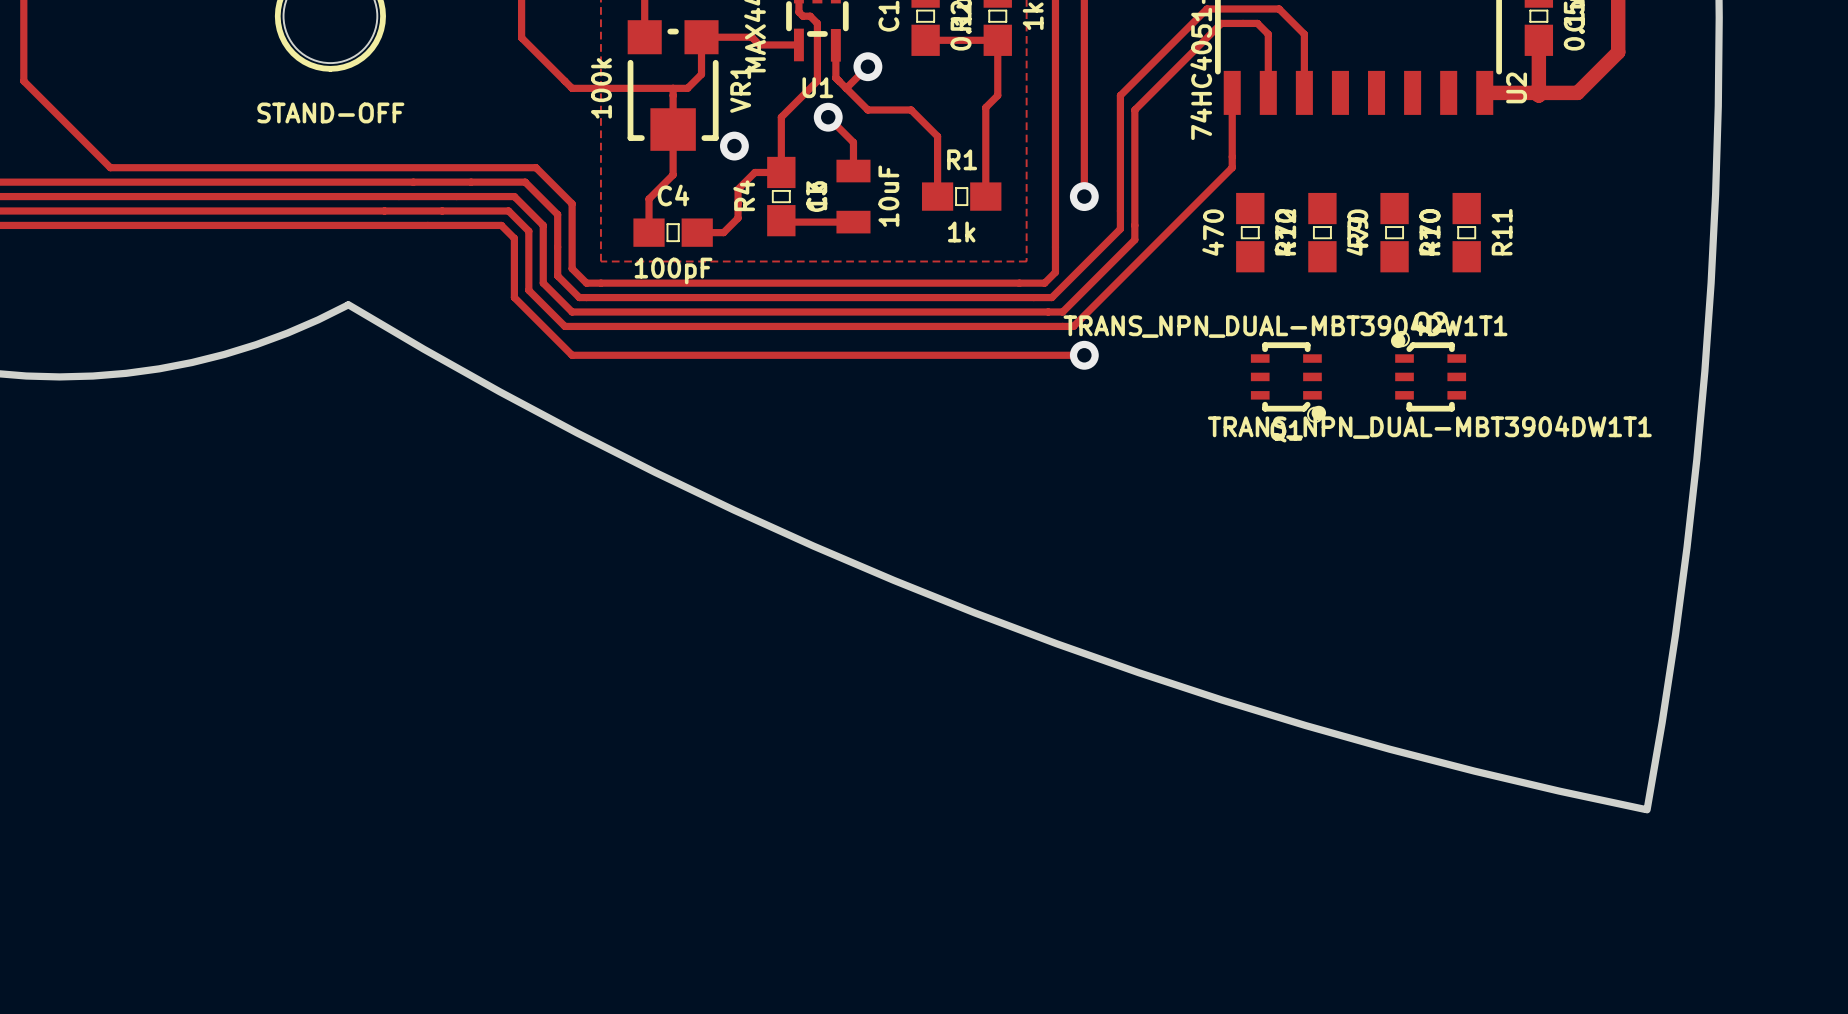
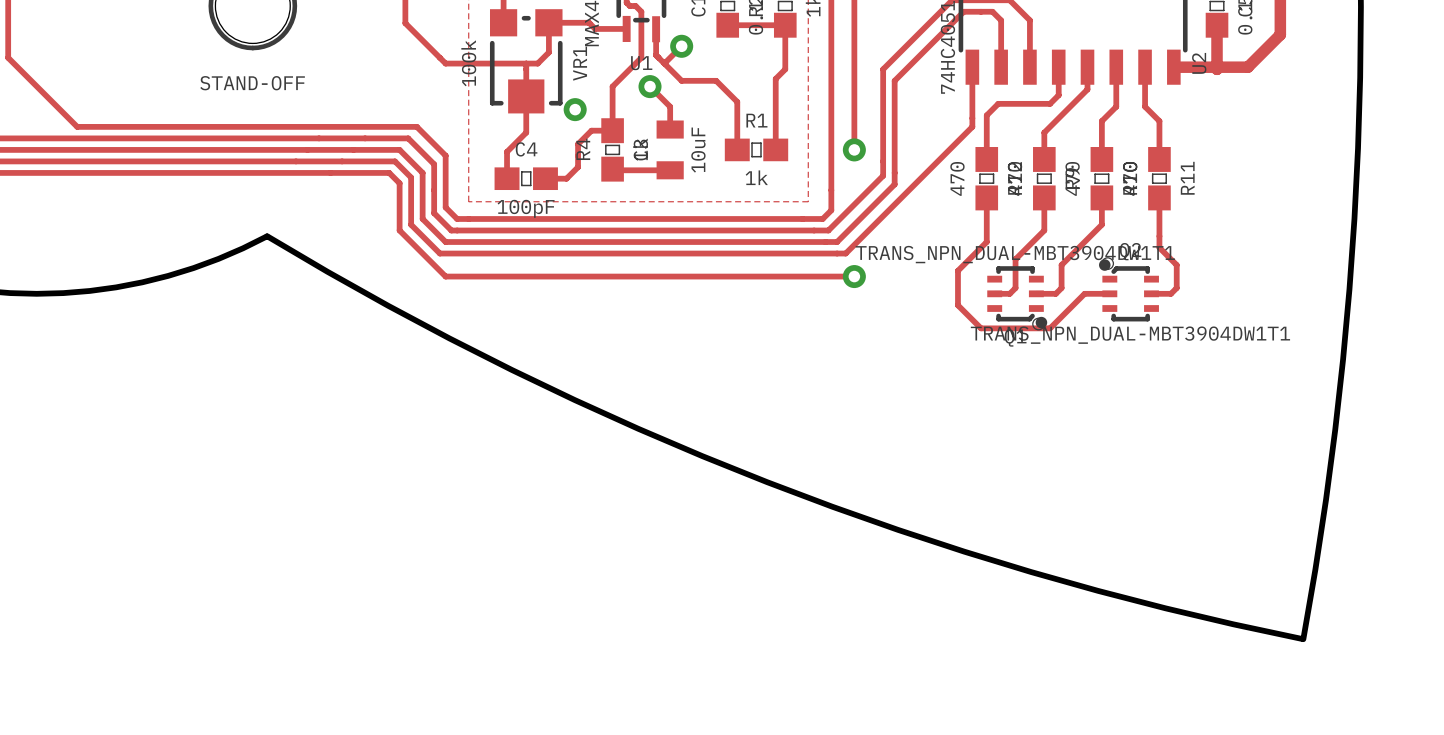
track: none -> (1058, 67) (1058, 95) (1050, 103) (998, 103) (986, 115) (986, 159)
track: none -> (1087, 67) (1087, 89) (1044, 132) (1044, 159)
track: none -> (1116, 67) (1116, 106) (1101, 121) (1101, 159)
track: none -> (1145, 67) (1145, 106) (1159, 121) (1159, 159)
track: none -> (986, 197) (986, 242) (957, 270) (957, 305) (981, 328) (1050, 328) (1084, 293) (1109, 293)
track: none -> (1044, 197) (1044, 230) (1015, 259) (1015, 288) (1009, 293) (994, 293)
track: none -> (1101, 197) (1101, 224) (1061, 265) (1061, 288) (1055, 293) (1036, 293)
track: none -> (1159, 197) (1159, 247) (1176, 265) (1176, 288) (1170, 293) (1151, 293)

